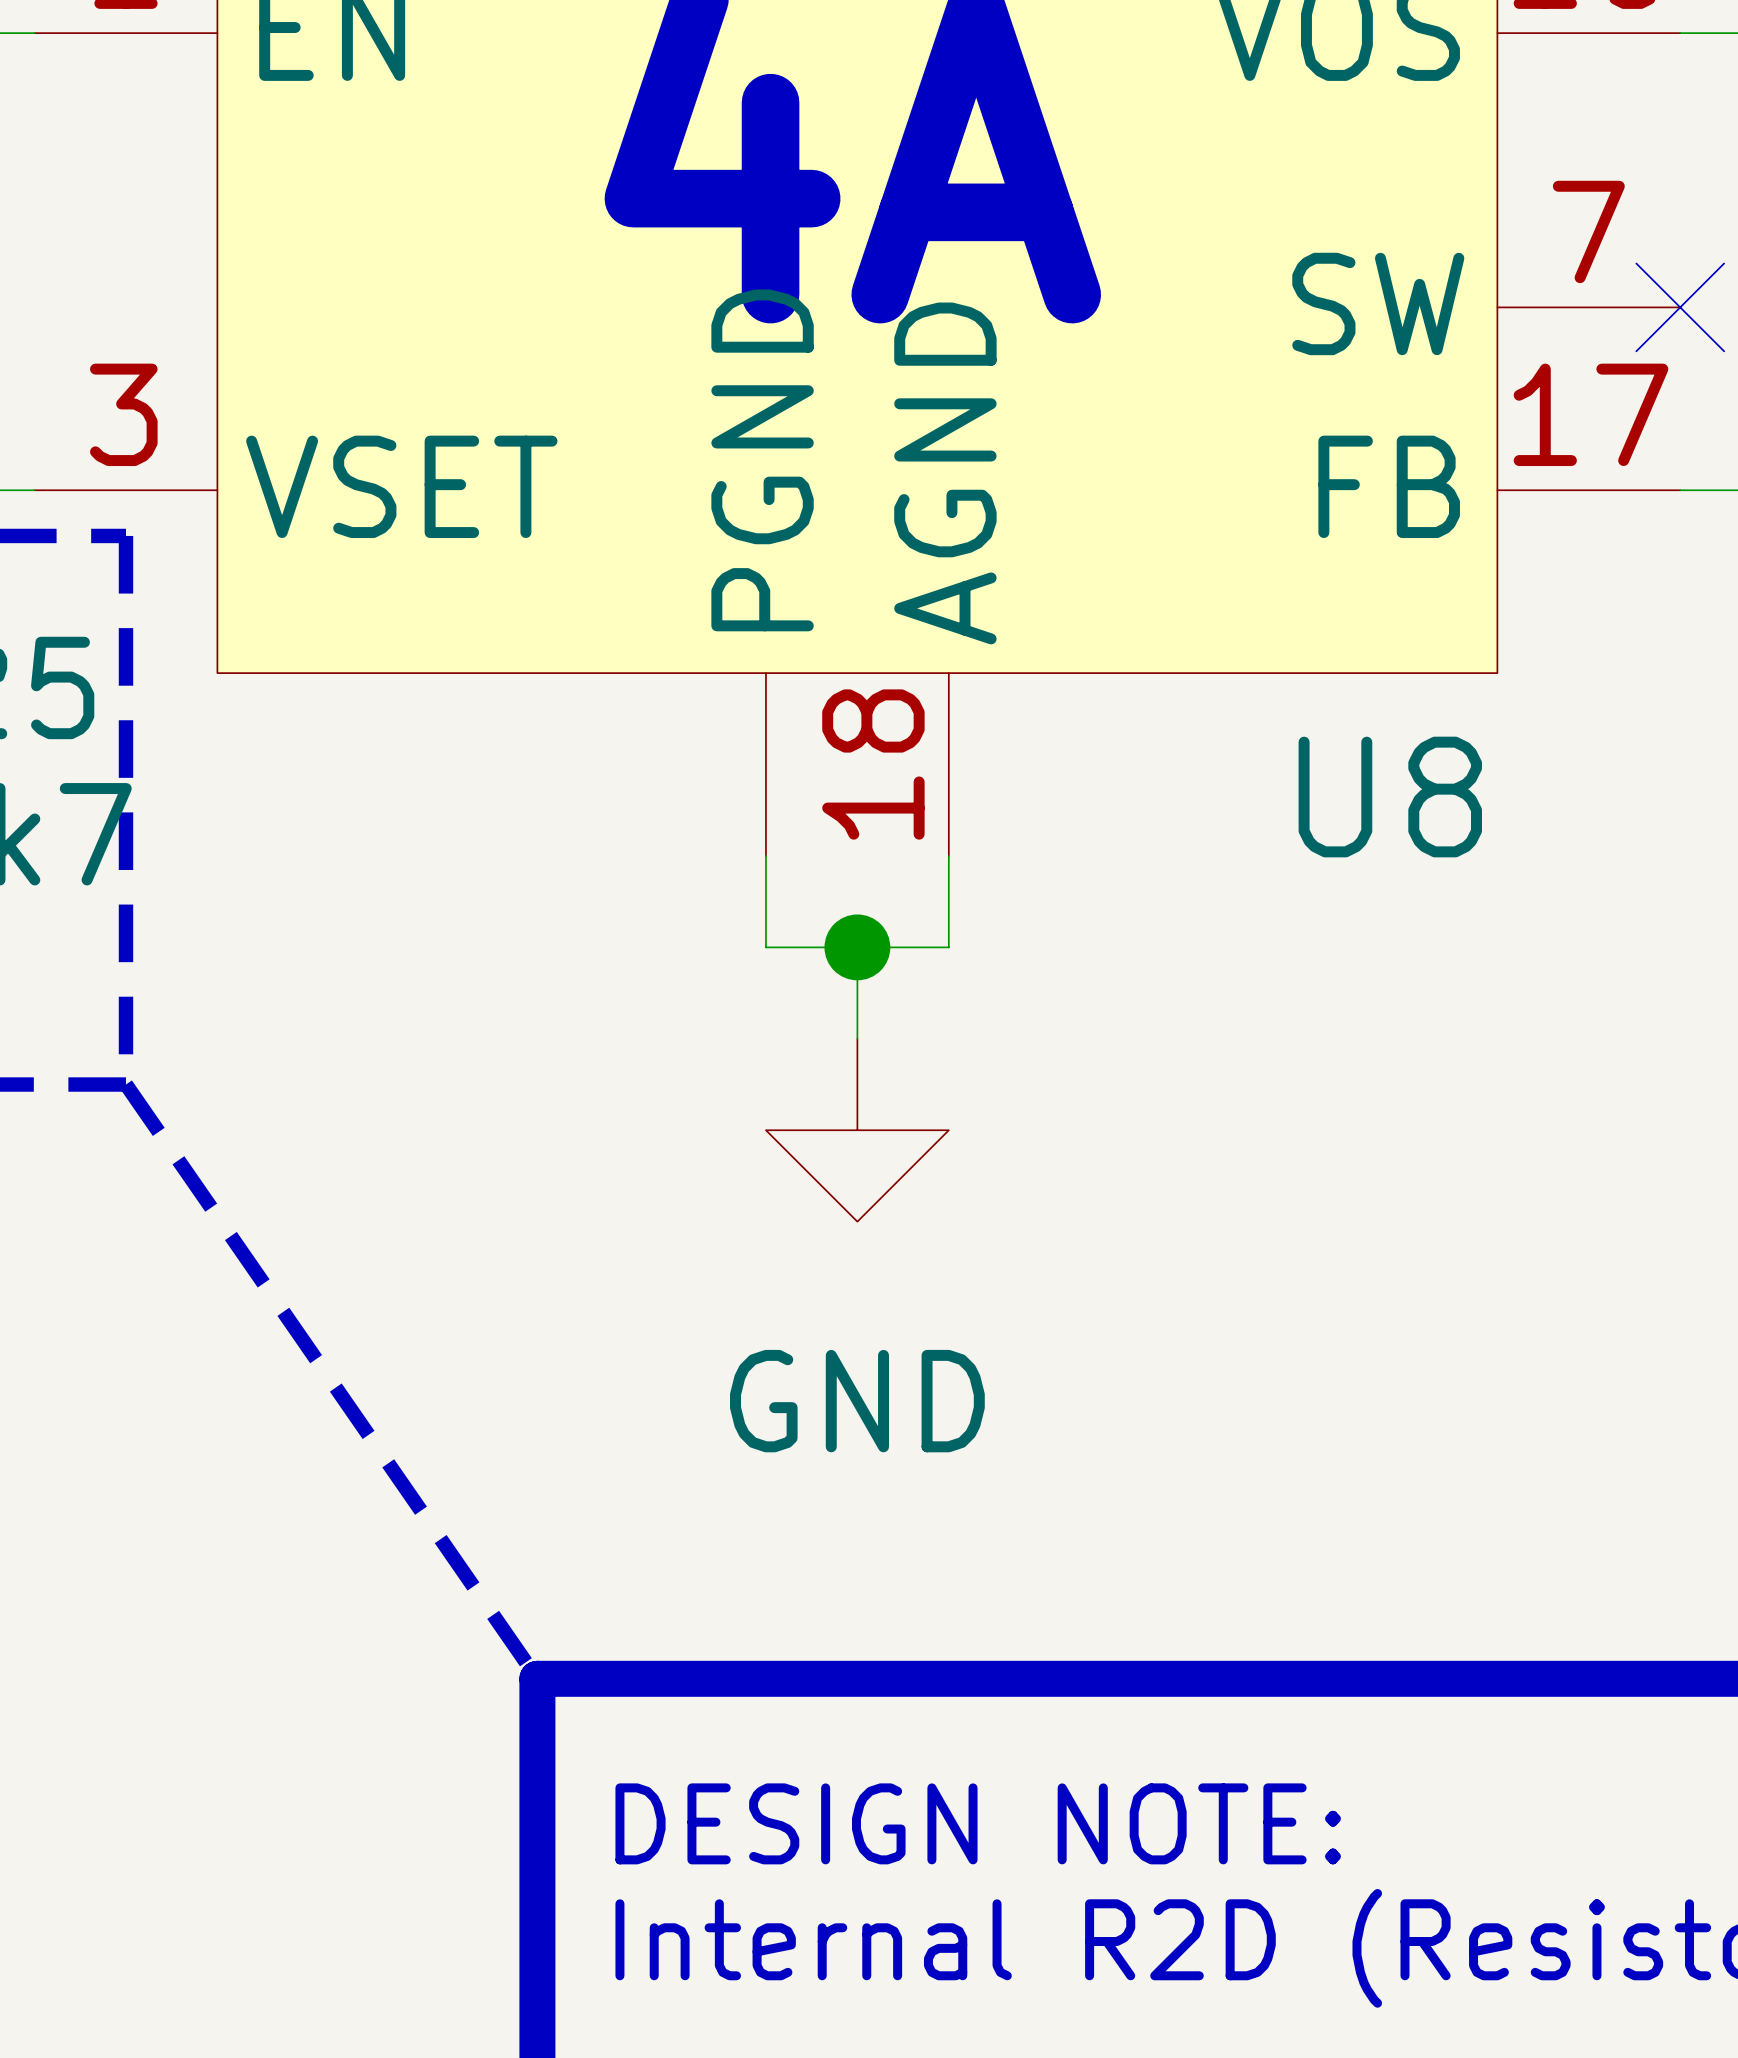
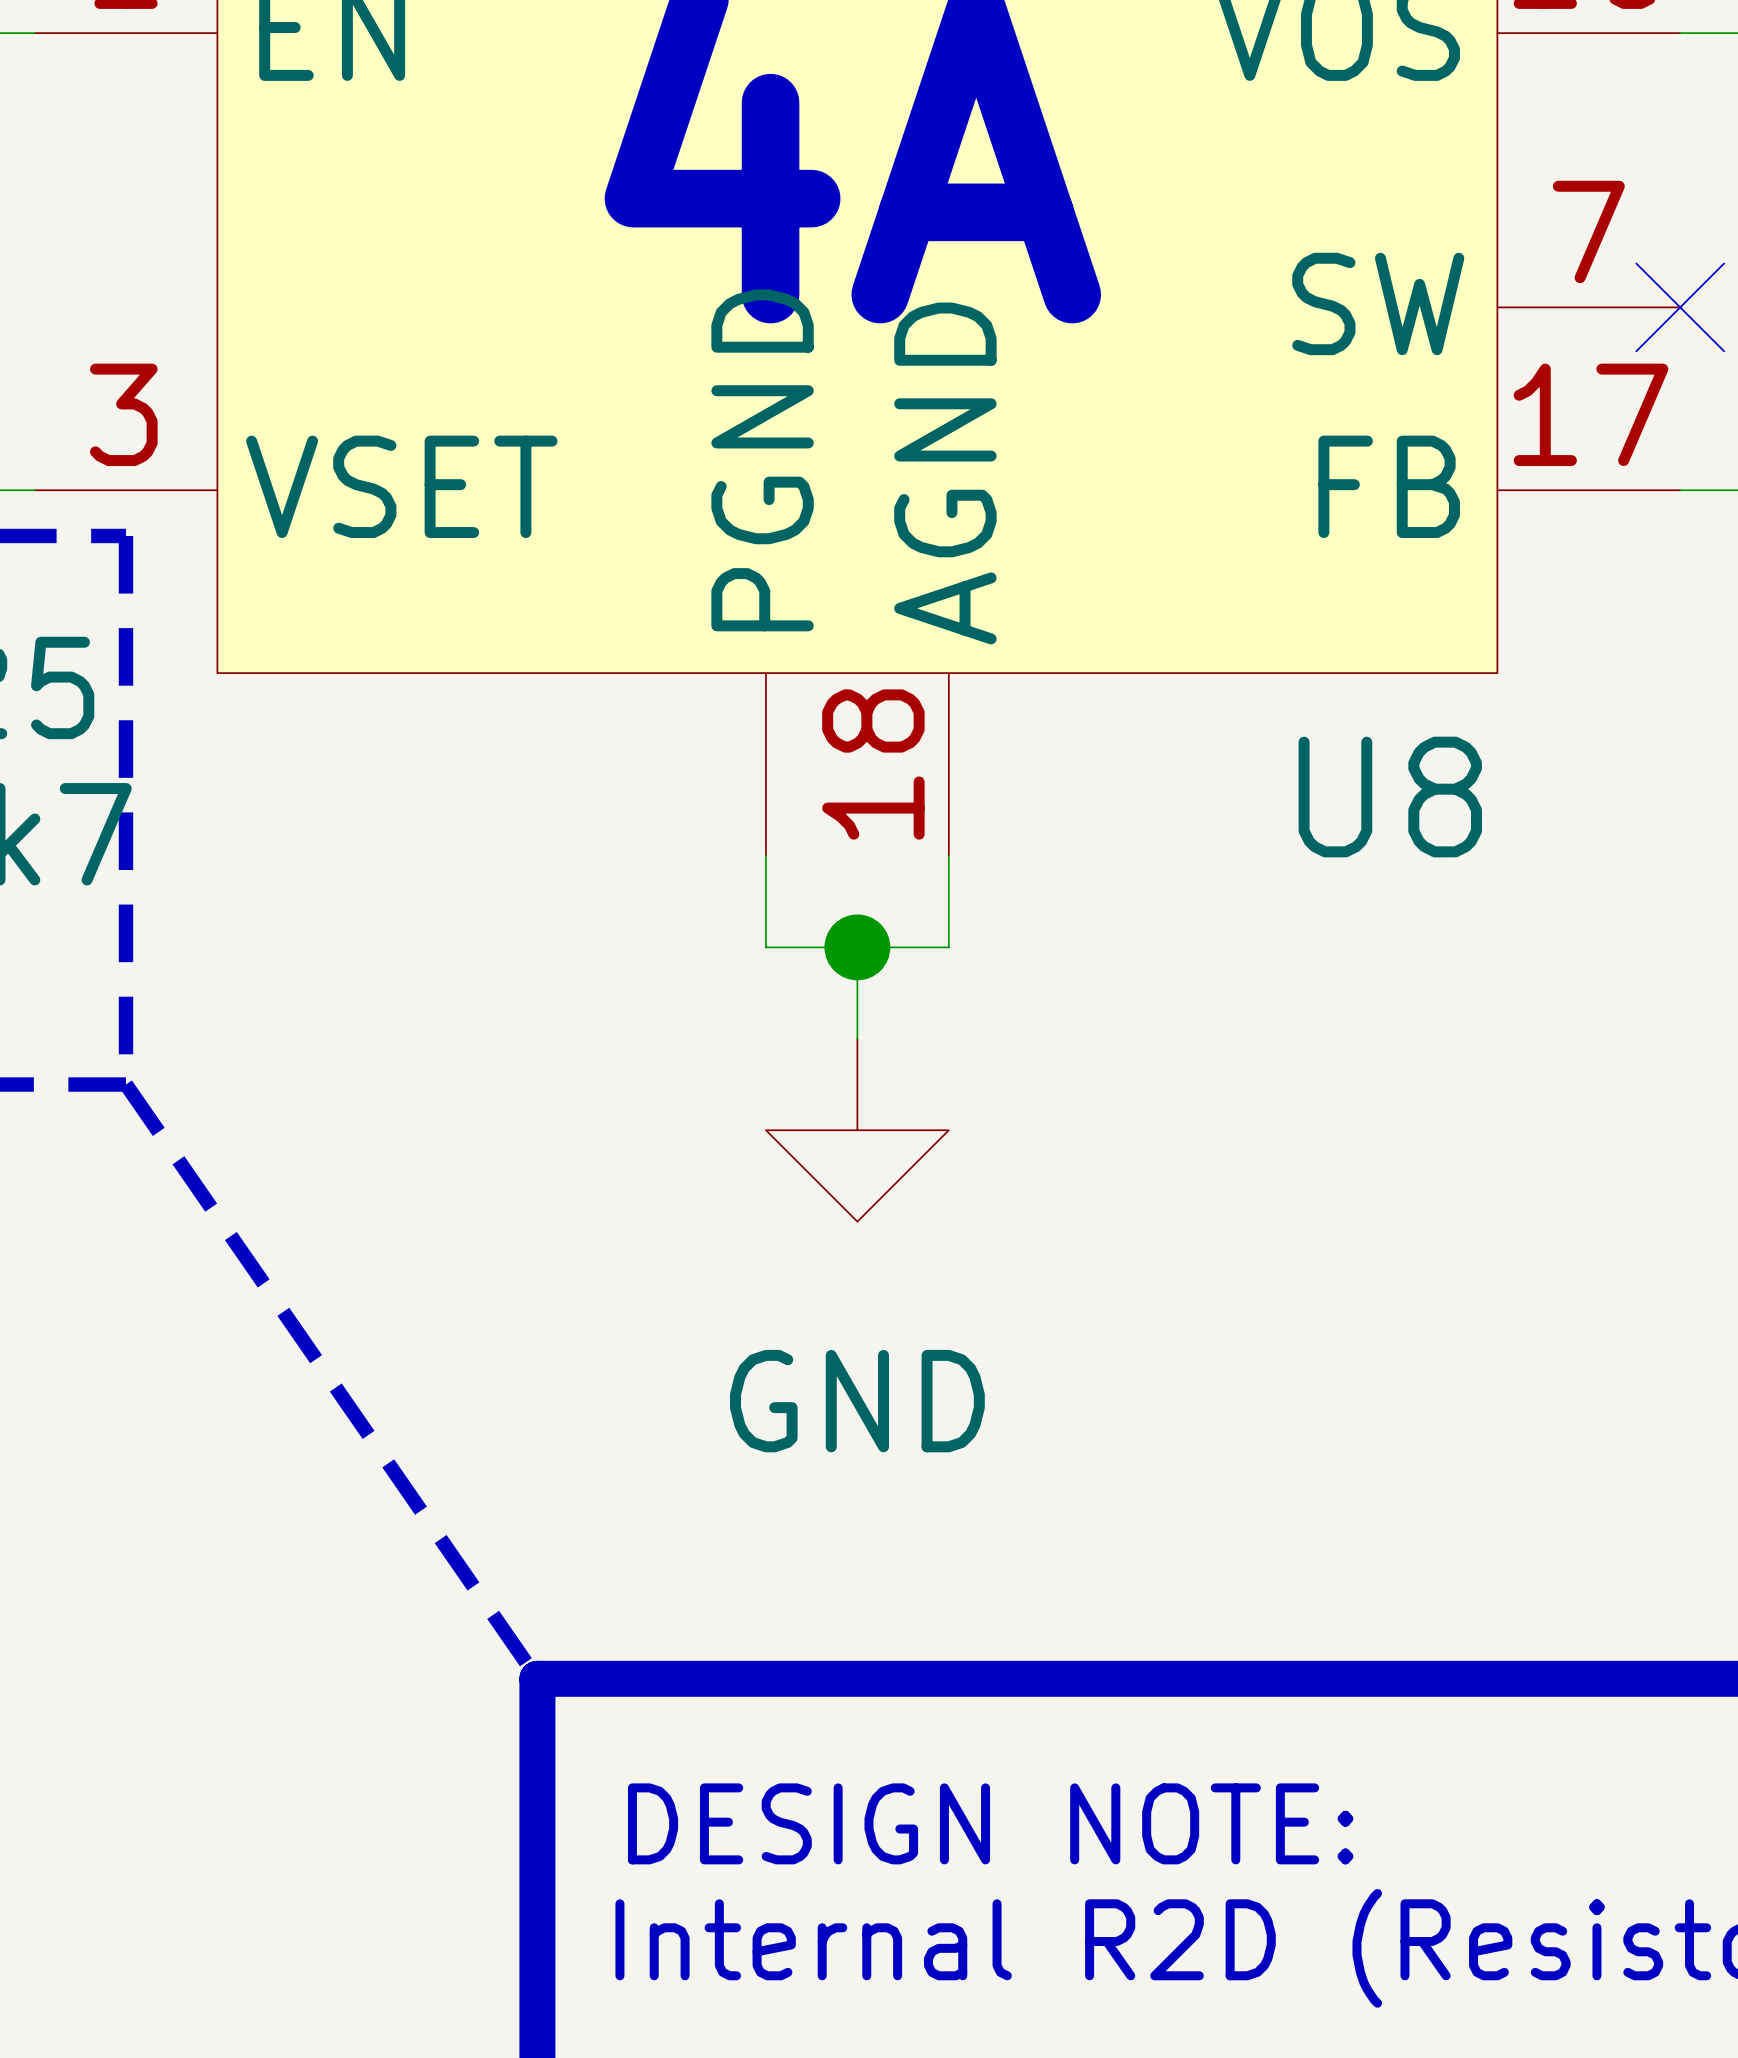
text position: DESIGN NOTE: (978, 1823) -> DESIGN NOTE: (990, 1823)

